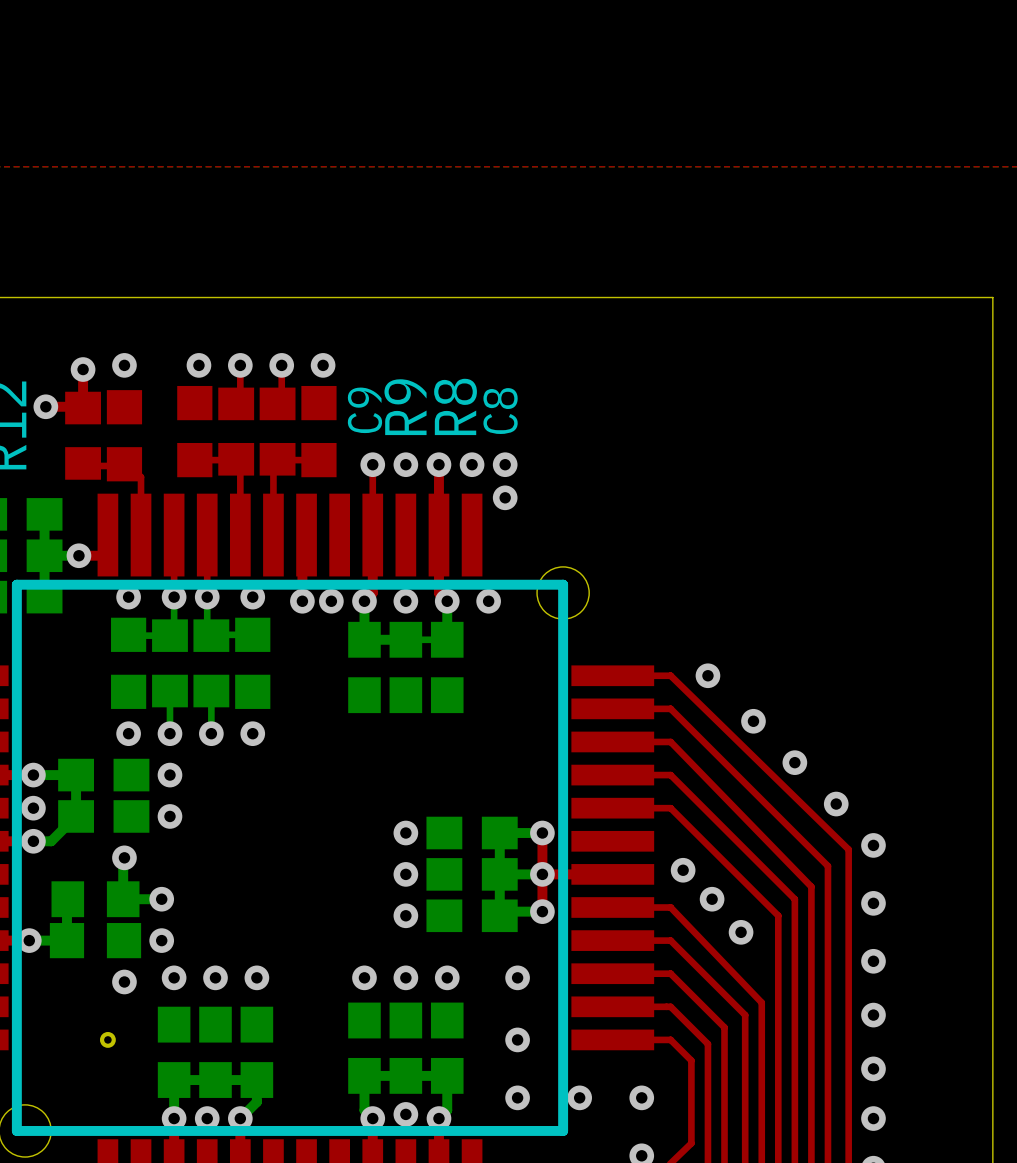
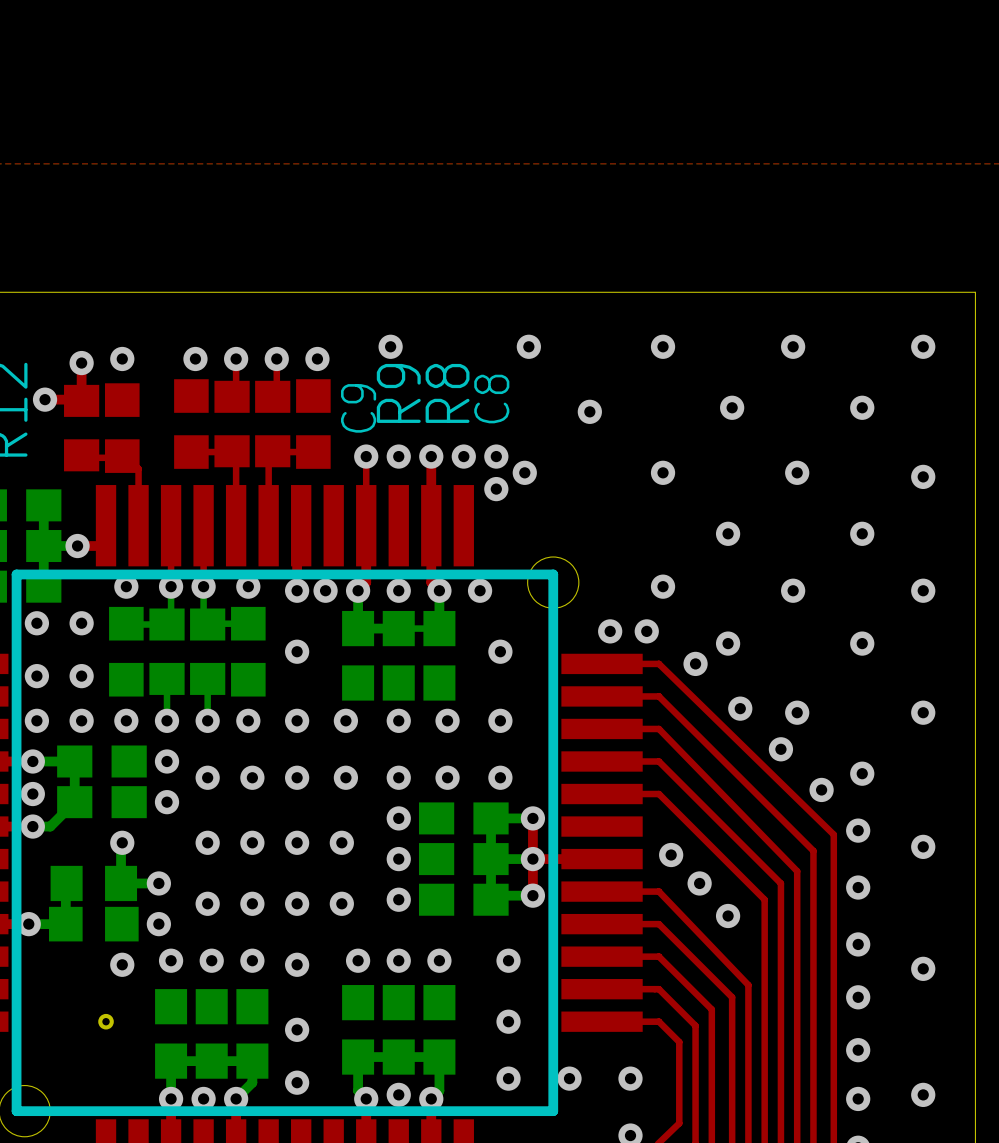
via: none -> (390, 346)
via: none -> (528, 346)
via: none -> (663, 346)
via: none -> (793, 346)
via: none -> (923, 346)
via: none -> (732, 407)
via: none -> (862, 407)
via: none -> (589, 411)
via: none -> (524, 472)
via: none -> (663, 472)
via: none -> (797, 472)
via: none -> (923, 476)
via: none -> (728, 533)
via: none -> (862, 533)
via: none -> (663, 586)
via: none -> (793, 590)
via: none -> (923, 590)
via: none -> (36, 623)
via: none -> (81, 623)
via: none -> (610, 631)
via: none -> (646, 631)
via: none -> (728, 643)
via: none -> (862, 643)
via: none -> (297, 651)
via: none -> (500, 651)
via: none -> (36, 676)
via: none -> (81, 676)
via: none -> (797, 712)
via: none -> (923, 712)
via: none -> (36, 720)
via: none -> (81, 720)
via: none -> (297, 720)
via: none -> (345, 720)
via: none -> (398, 720)
via: none -> (447, 720)
via: none -> (500, 720)
via: none -> (862, 773)
via: none -> (207, 777)
via: none -> (252, 777)
via: none -> (297, 777)
via: none -> (345, 777)
via: none -> (398, 777)
via: none -> (447, 777)
via: none -> (500, 777)
via: none -> (207, 842)
via: none -> (252, 842)
via: none -> (297, 842)
via: none -> (341, 842)
via: none -> (923, 846)
via: none -> (207, 903)
via: none -> (252, 903)
via: none -> (297, 903)
via: none -> (341, 903)
via: none -> (297, 964)
via: none -> (923, 968)
via: none -> (297, 1029)
via: none -> (297, 1082)
via: none -> (923, 1094)

